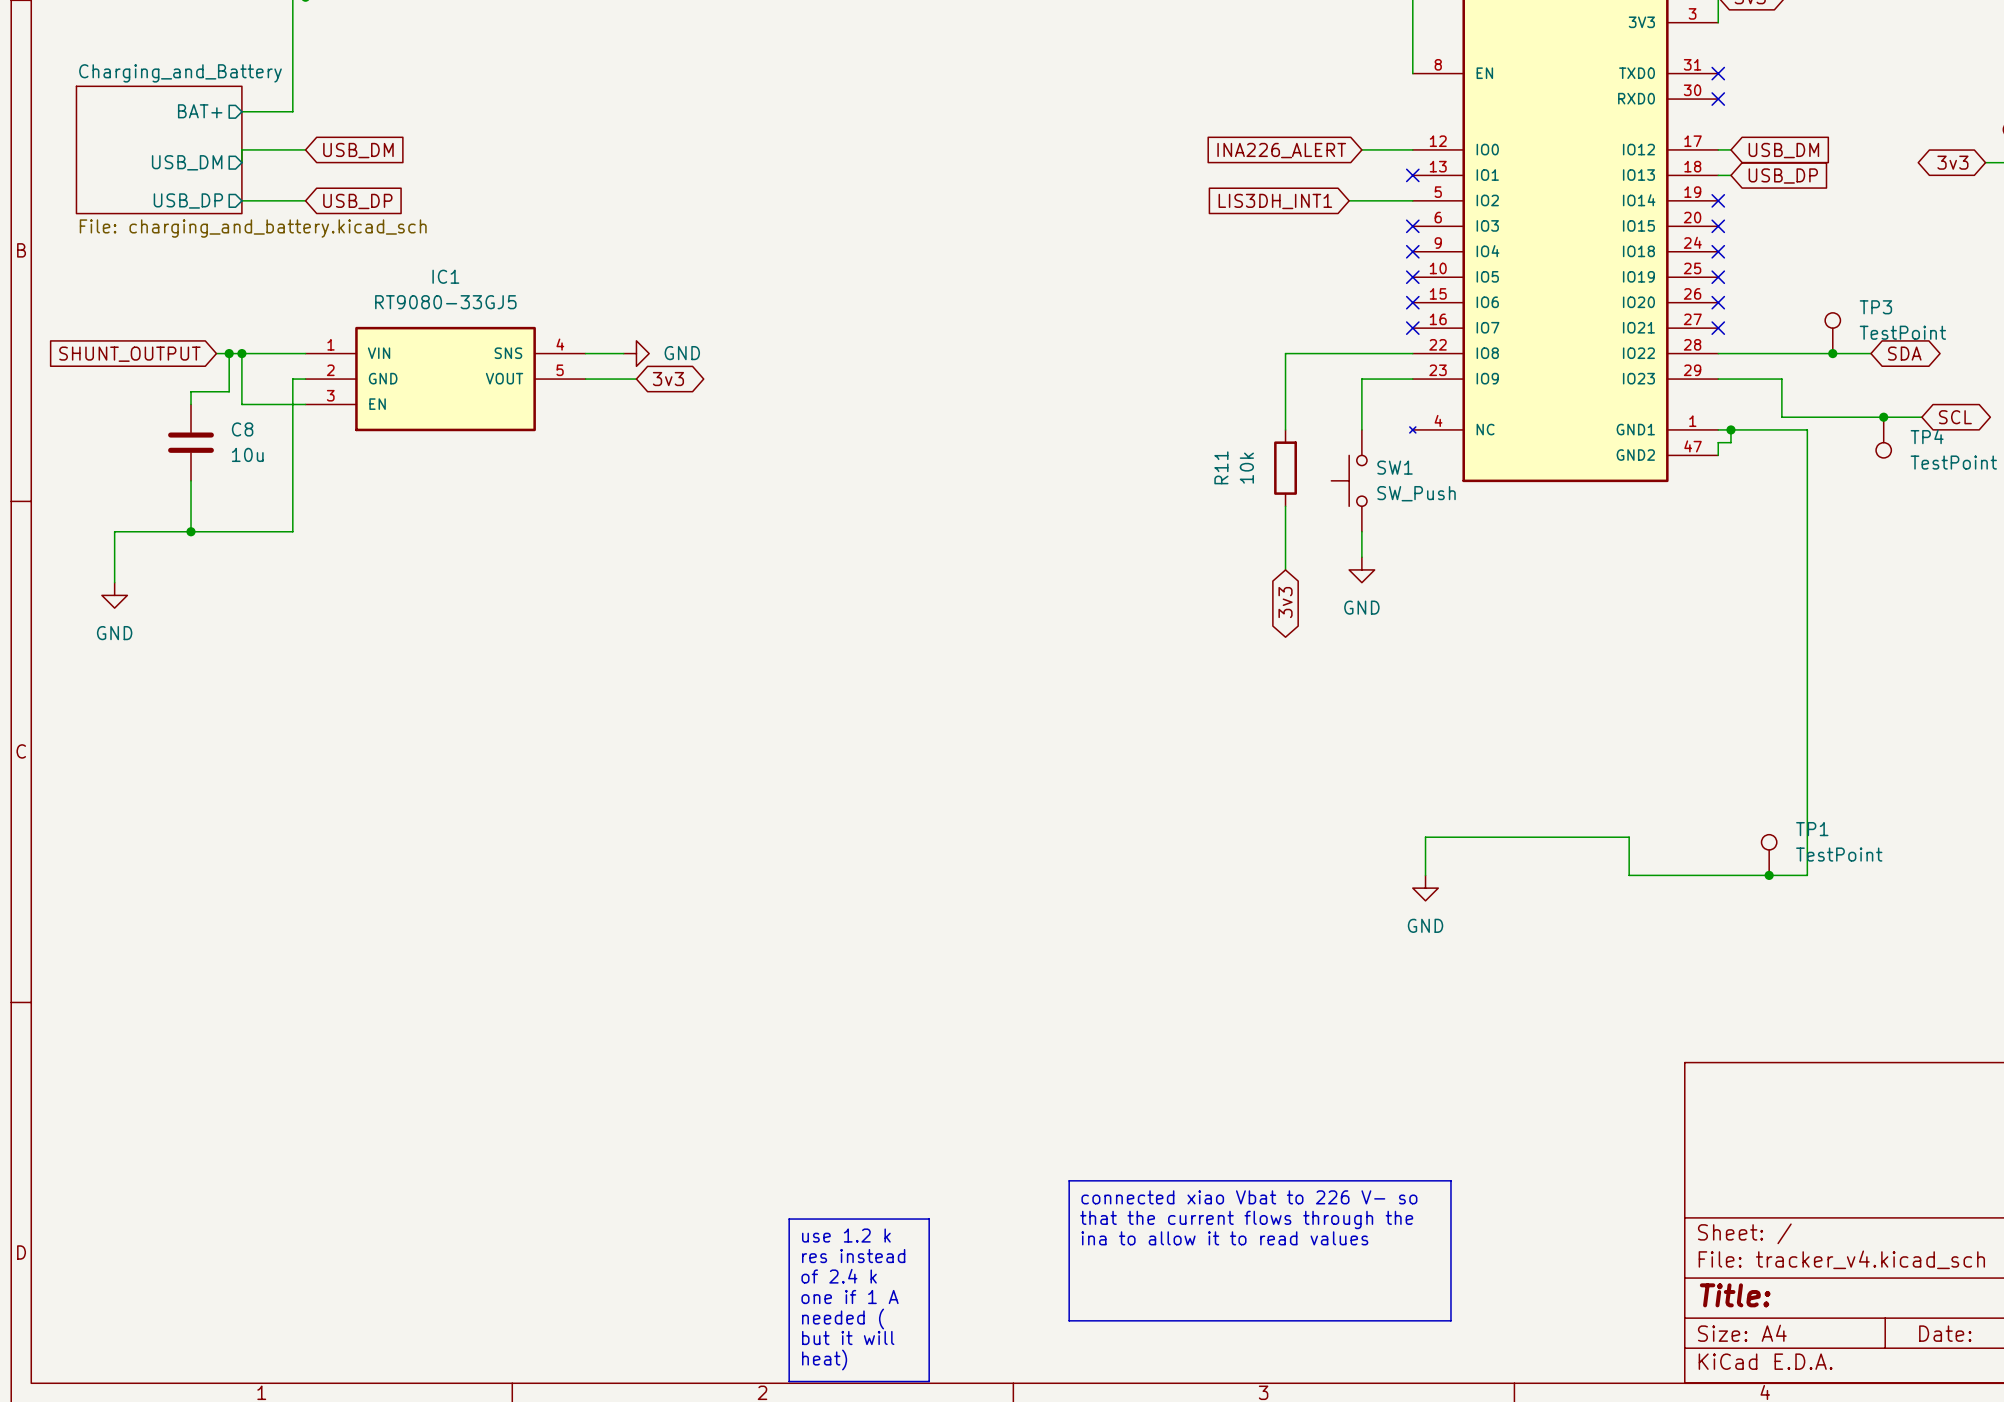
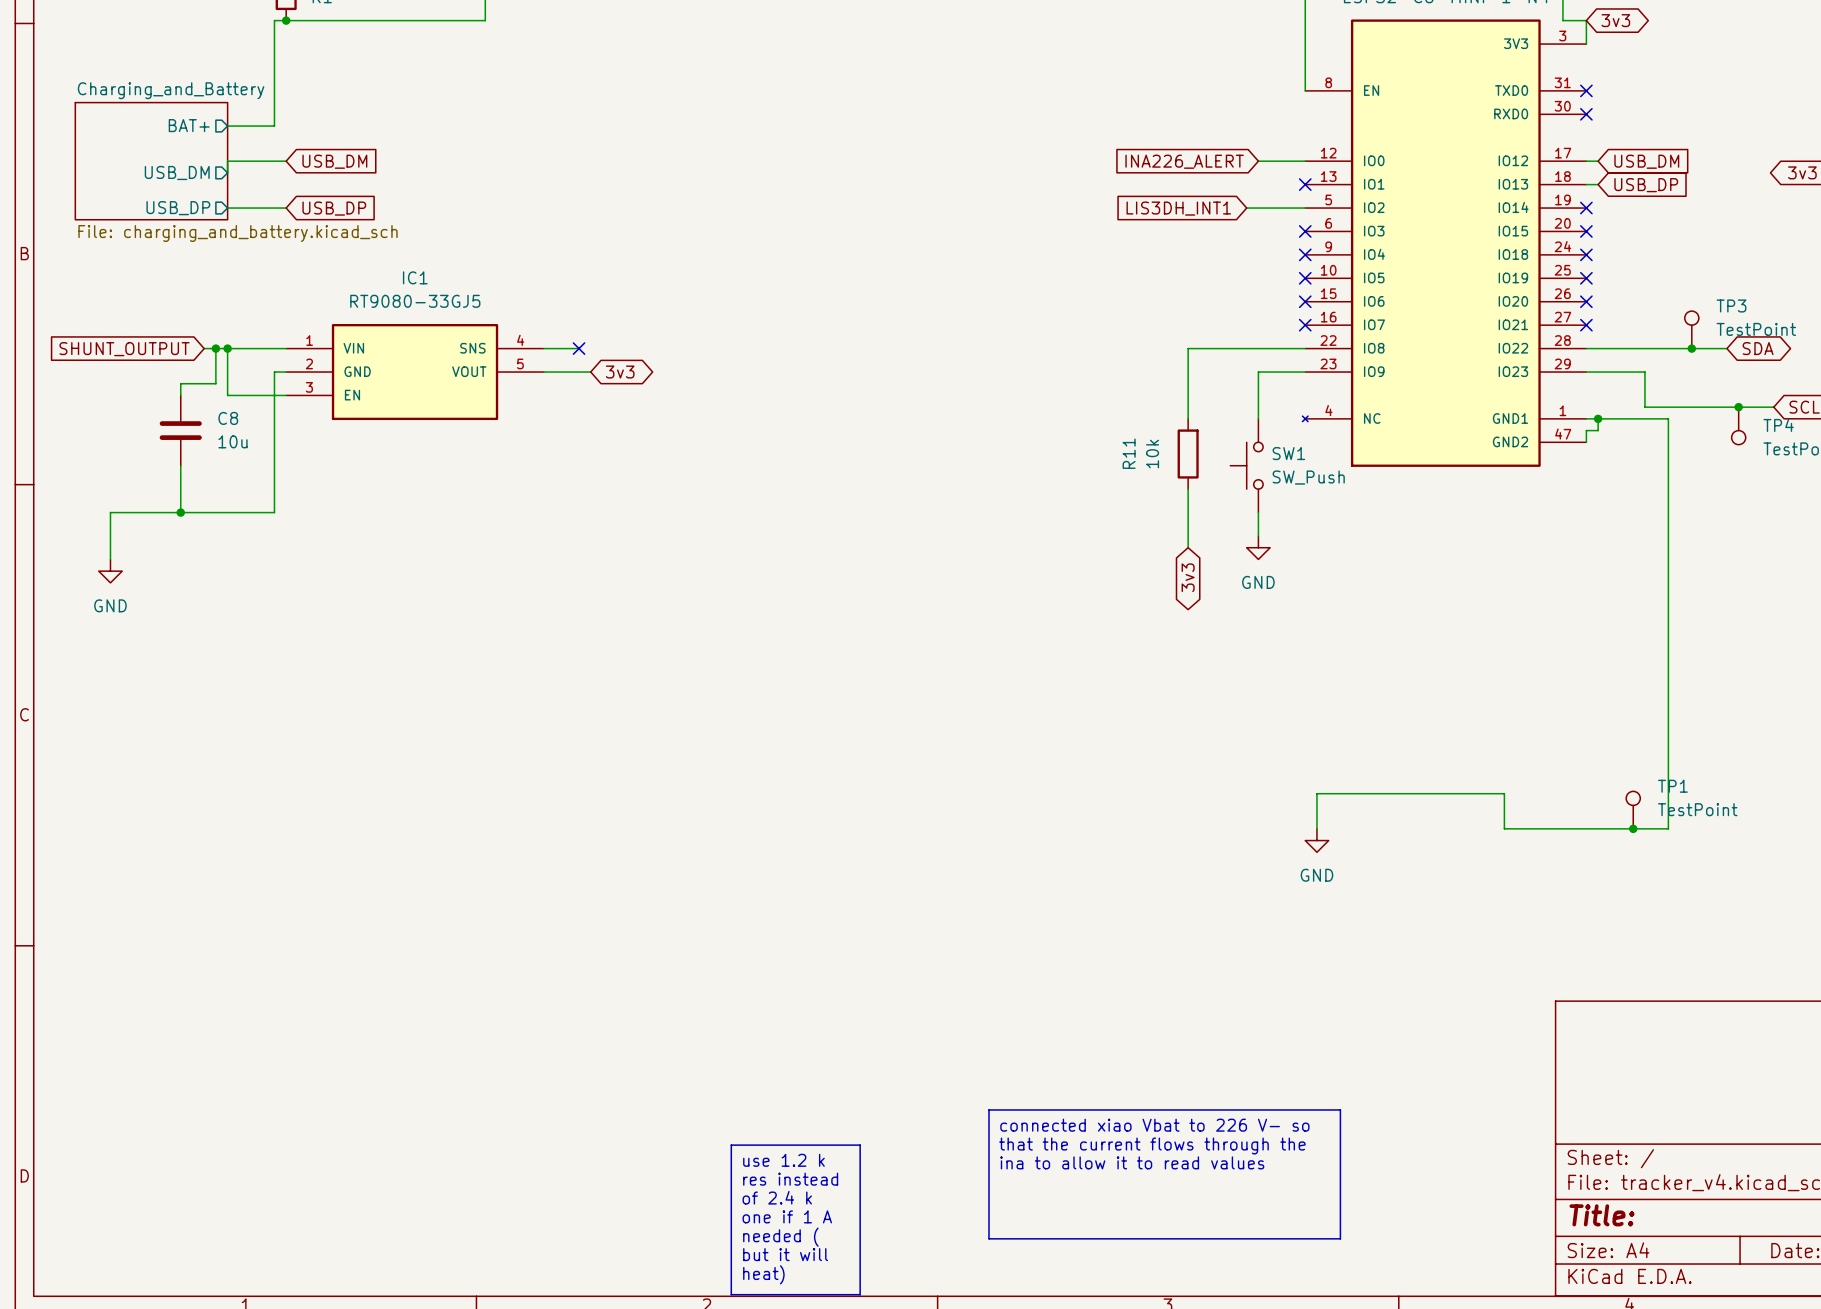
no-connect mark: none -> (579, 348)
power symbol: GND (636, 353) -> none

